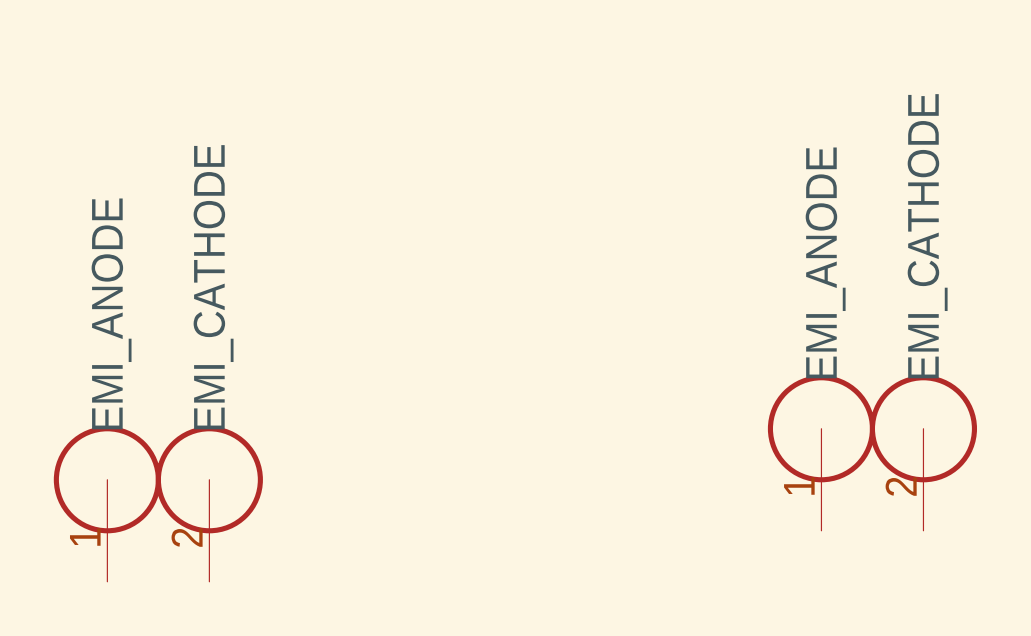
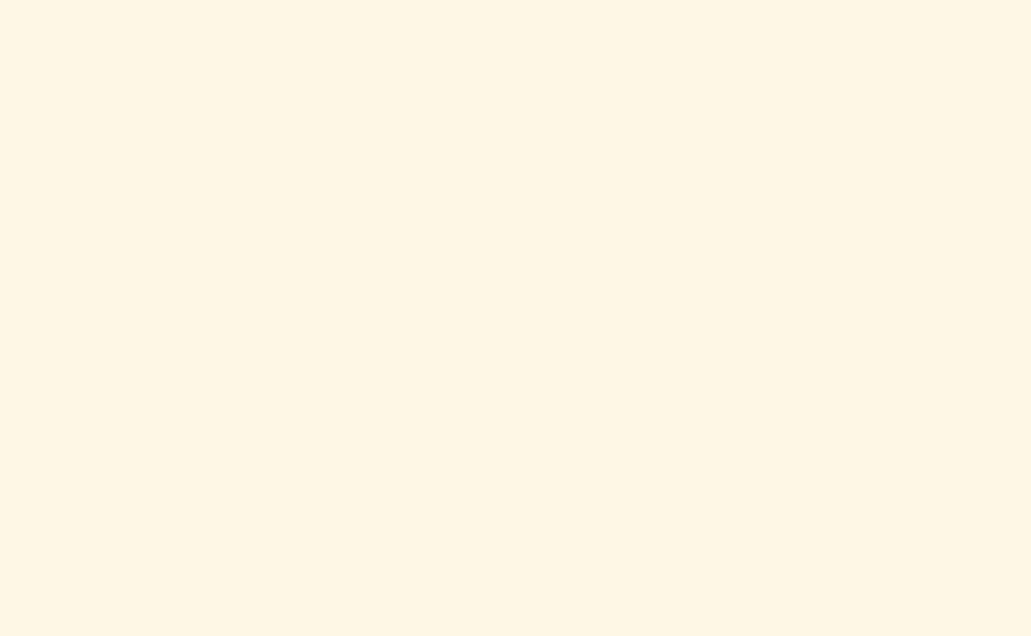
part: (872, 452) -> none
part: (158, 504) -> none

